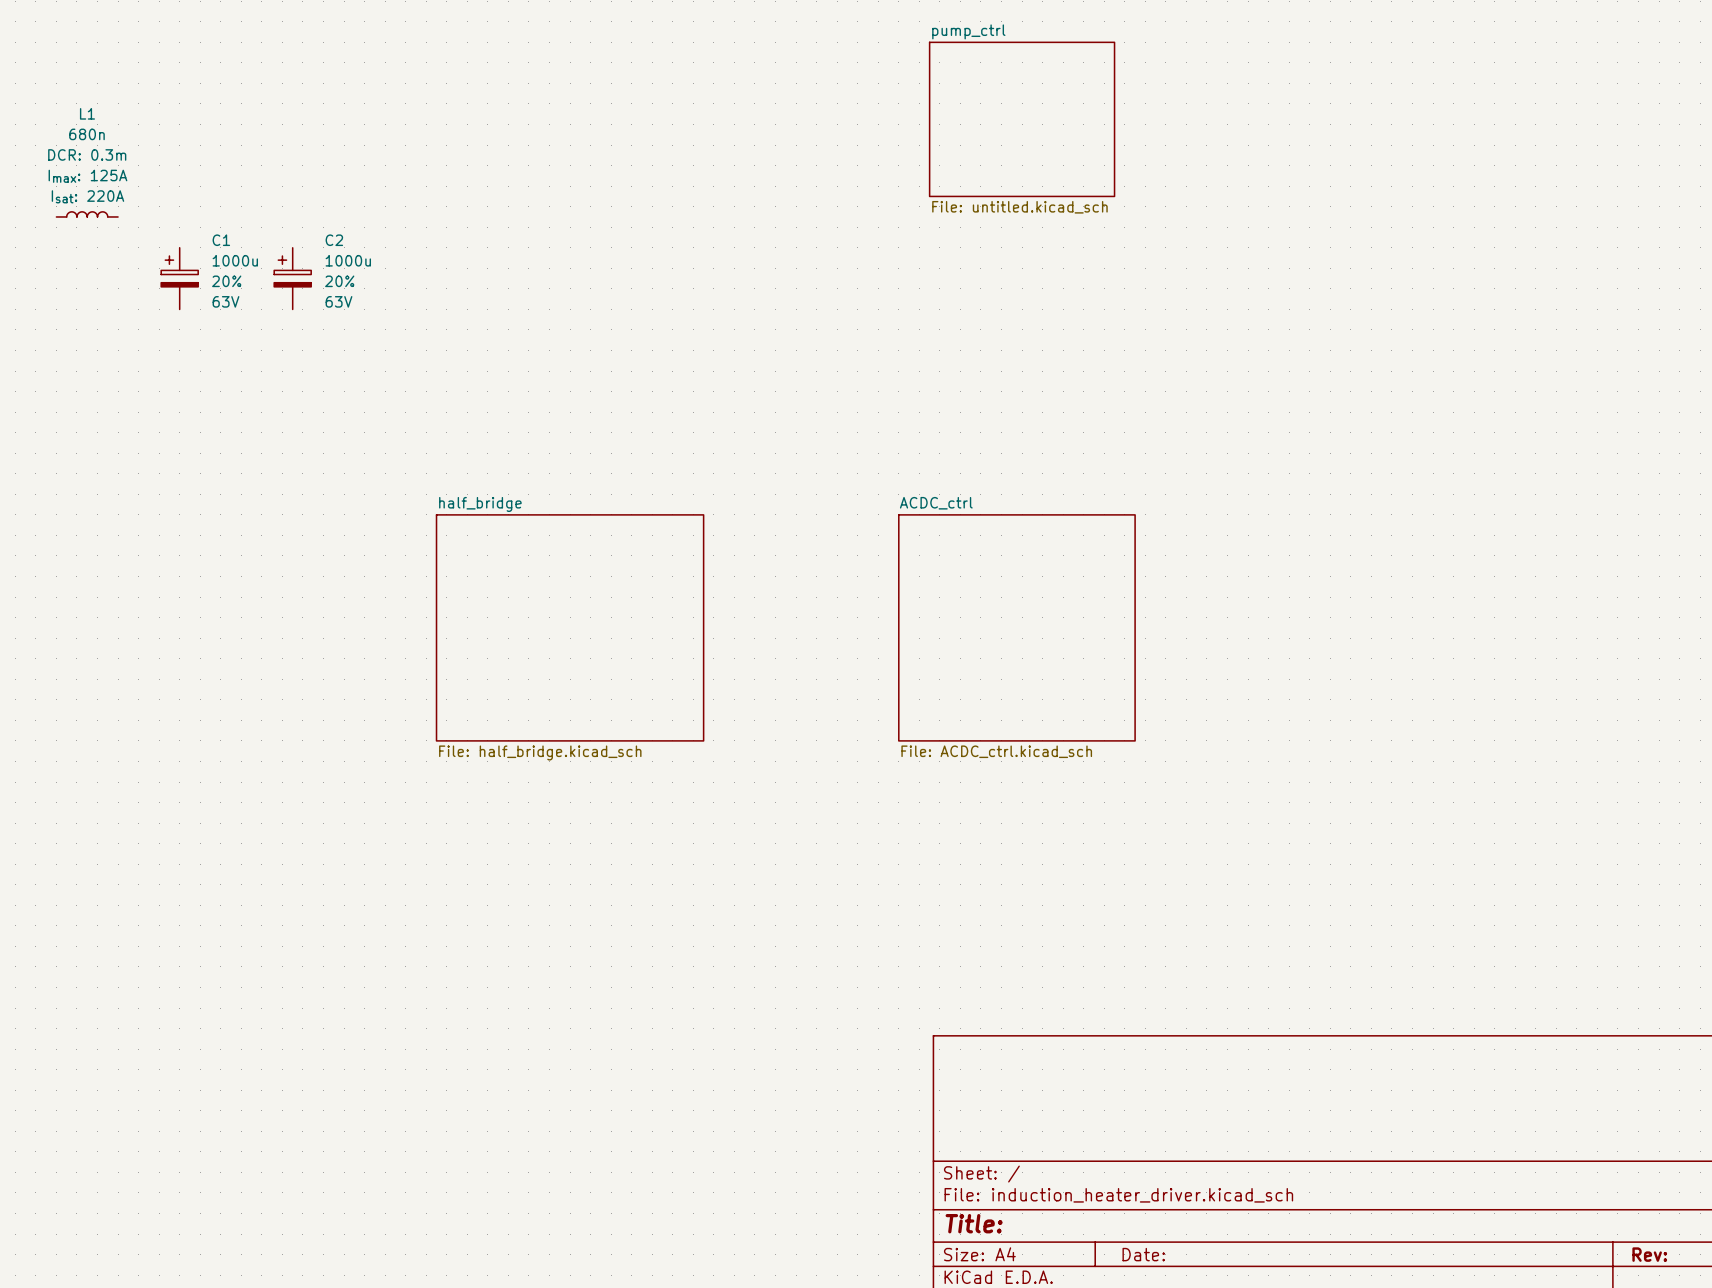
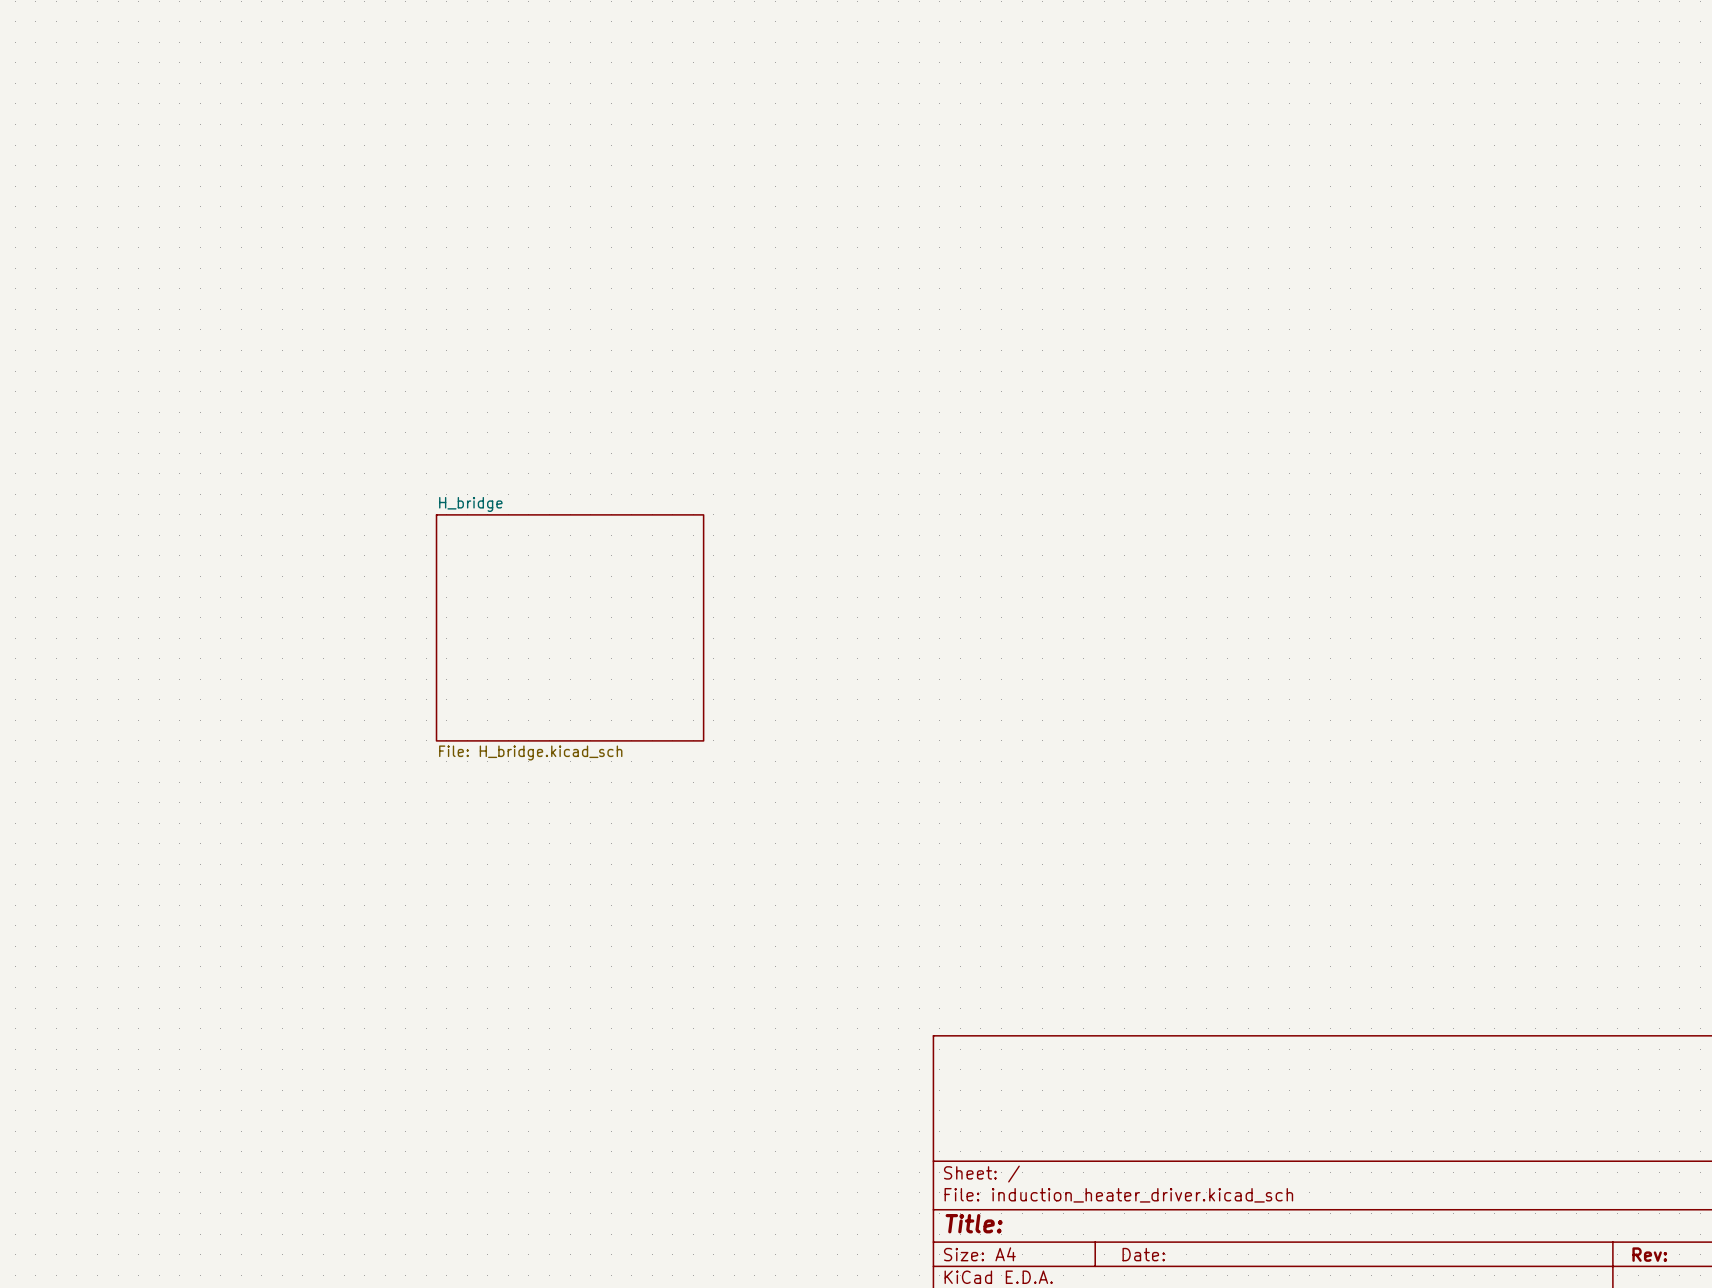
sheet pump_ctrl: File: untitled.kicad_sch (1022, 119) -> none
L1: 680n (87, 214) -> none
C1: 1000u (179, 278) -> none
C2: 1000u (292, 278) -> none
sheet half_bridge name: half_bridge (480, 504) -> H_bridge (470, 504)
sheet ACDC_ctrl: File: ACDC_ctrl.kicad_sch (1016, 627) -> none
sheet half_bridge value: File: half_bridge.kicad_sch (540, 752) -> File: H_bridge.kicad_sch (530, 752)

